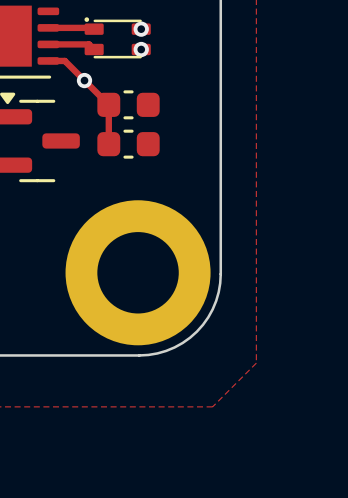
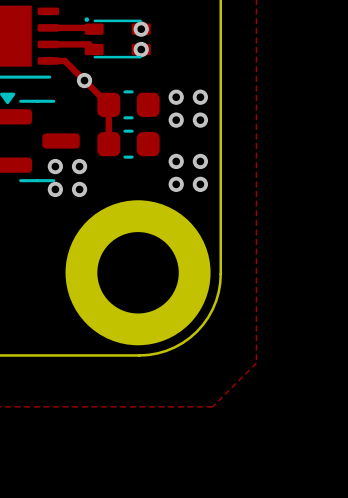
via: none -> (176, 97)
via: none -> (200, 97)
via: none -> (176, 120)
via: none -> (200, 120)
via: none -> (176, 161)
via: none -> (200, 161)
via: none -> (55, 166)
via: none -> (79, 166)
via: none -> (176, 184)
via: none -> (200, 184)
via: none -> (55, 189)
via: none -> (79, 189)

